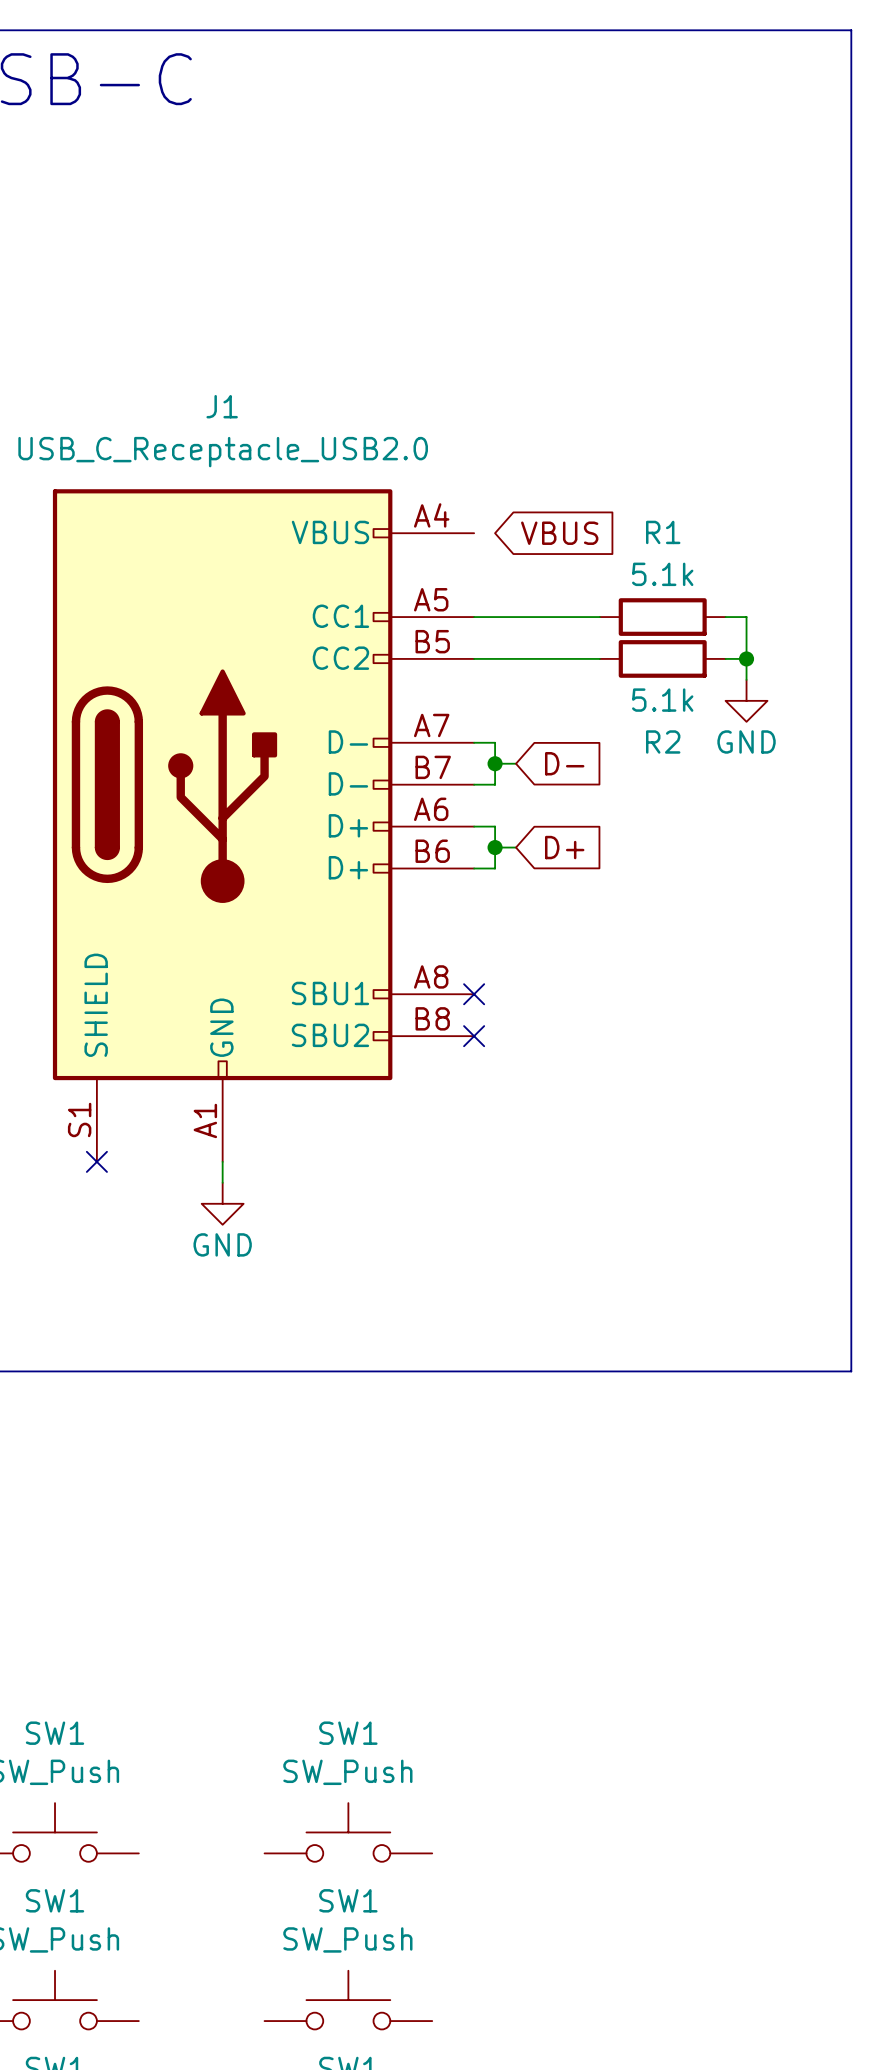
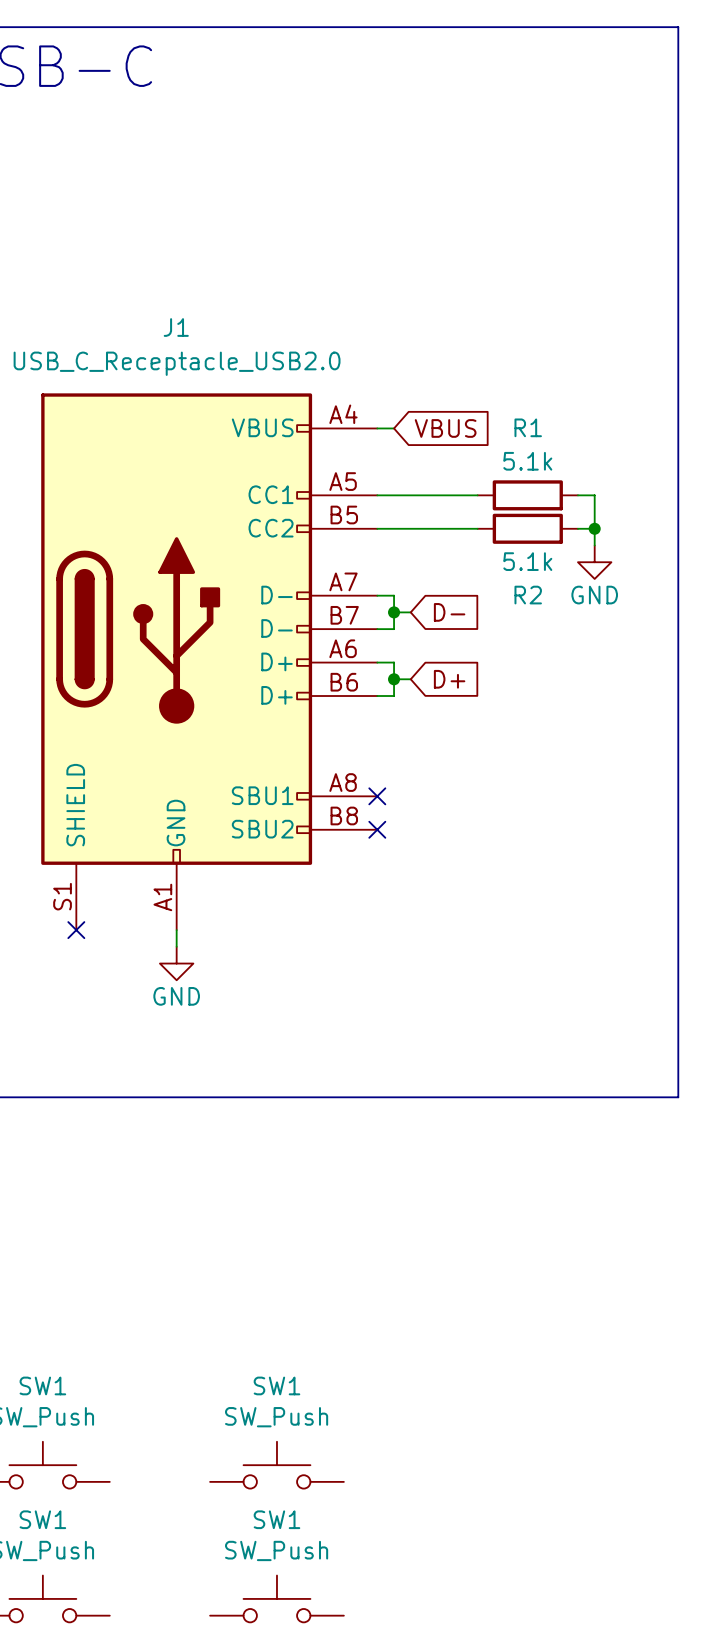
wire: none -> (377, 428) (394, 428)

